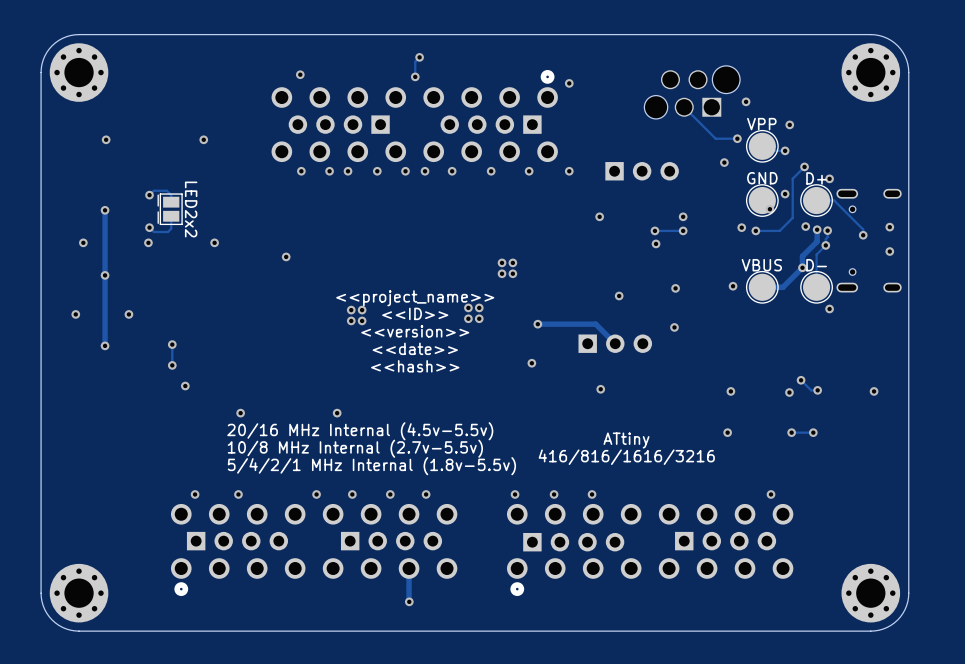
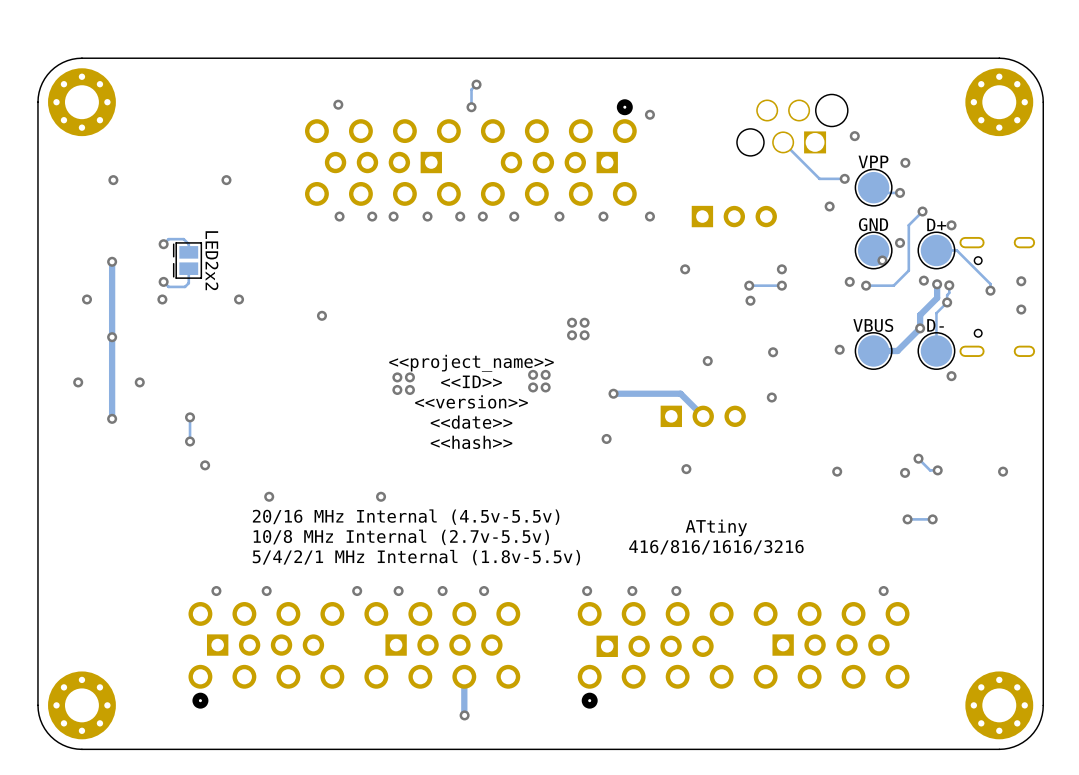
via: (727, 432) -> none

